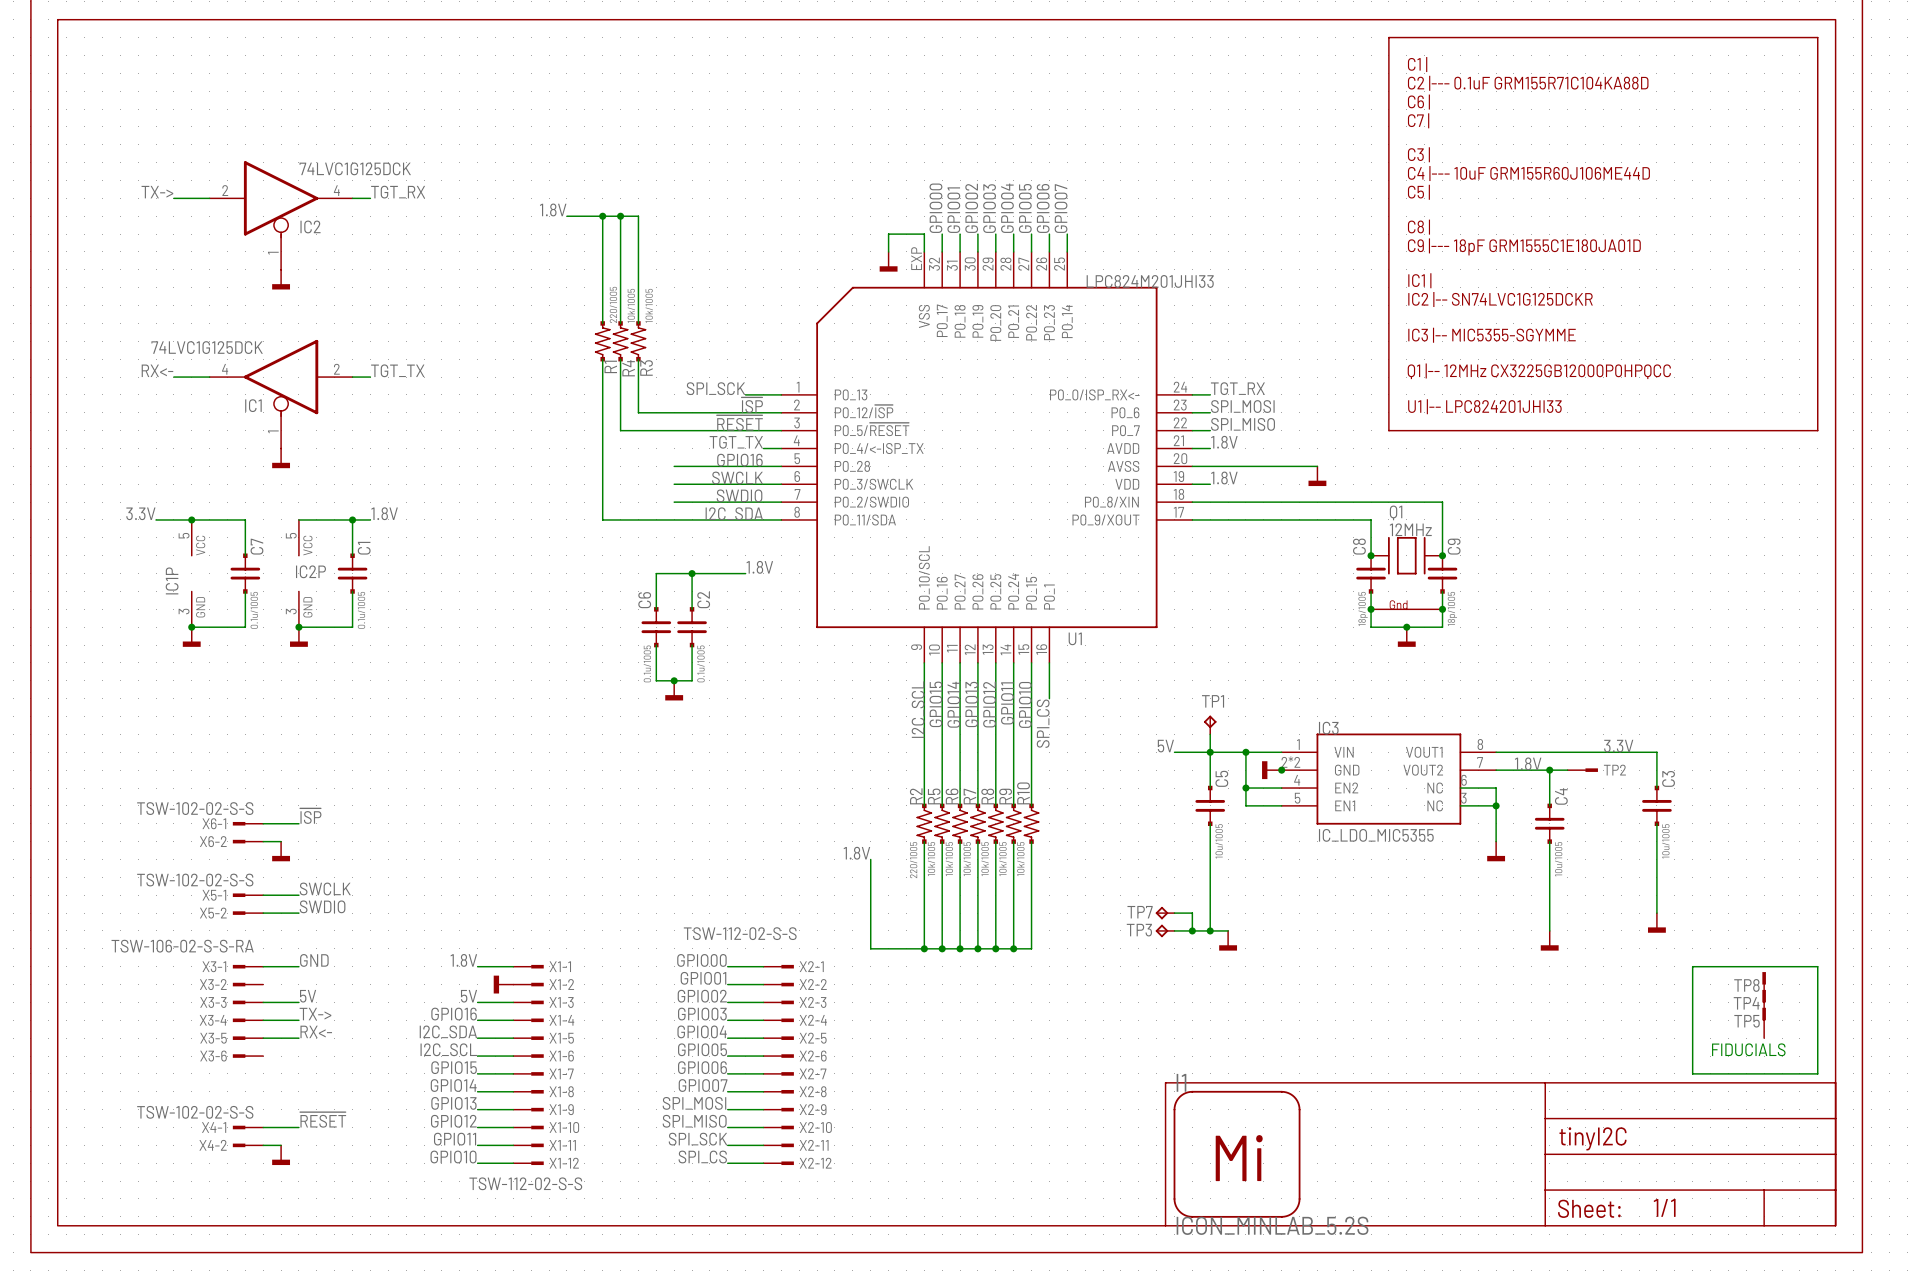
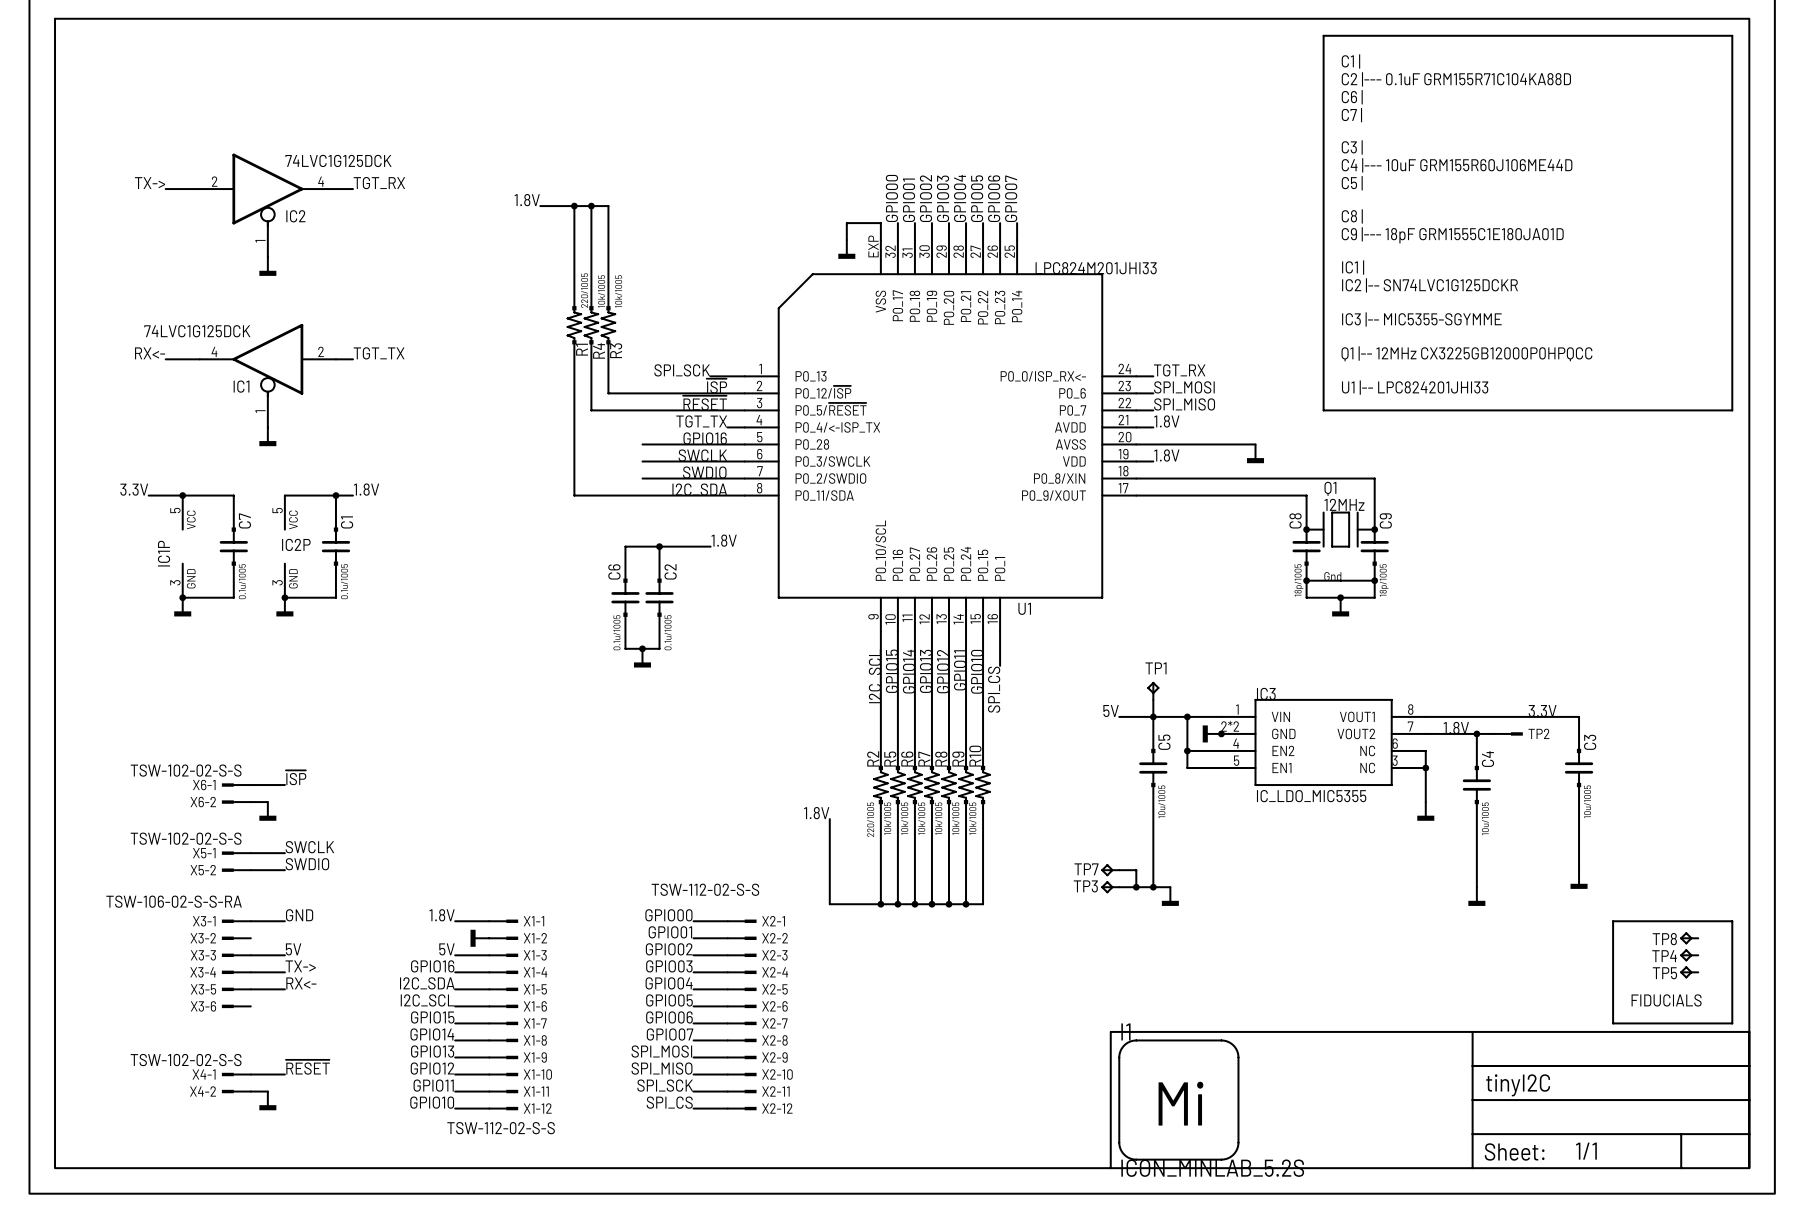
TP8 symbol: [1762, 972, 1766, 1003] -> [1680, 932, 1699, 945]
TP4 symbol: [1762, 989, 1766, 1021] -> [1680, 949, 1699, 962]
TP5 symbol: [1762, 1007, 1766, 1039] -> [1680, 966, 1699, 979]

